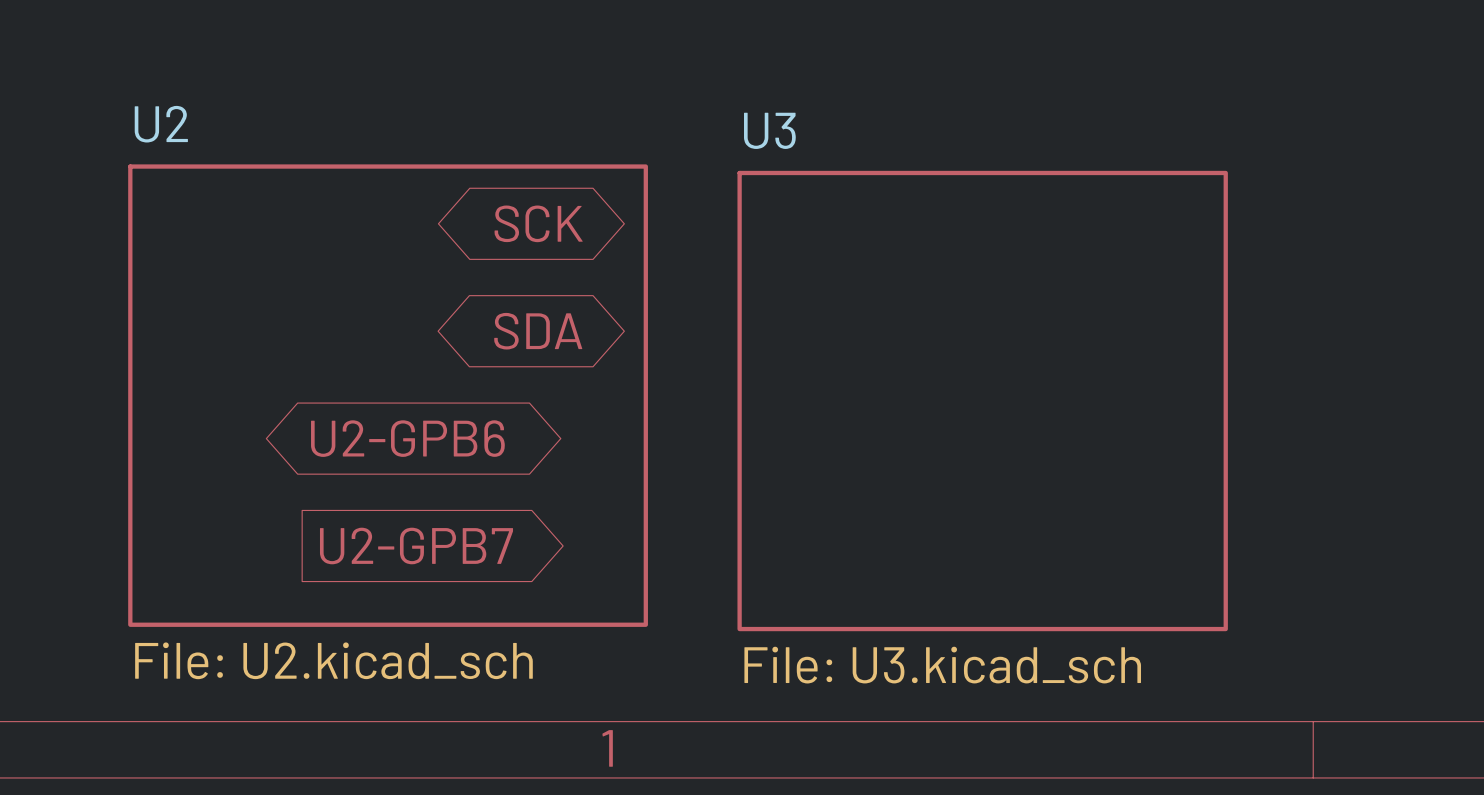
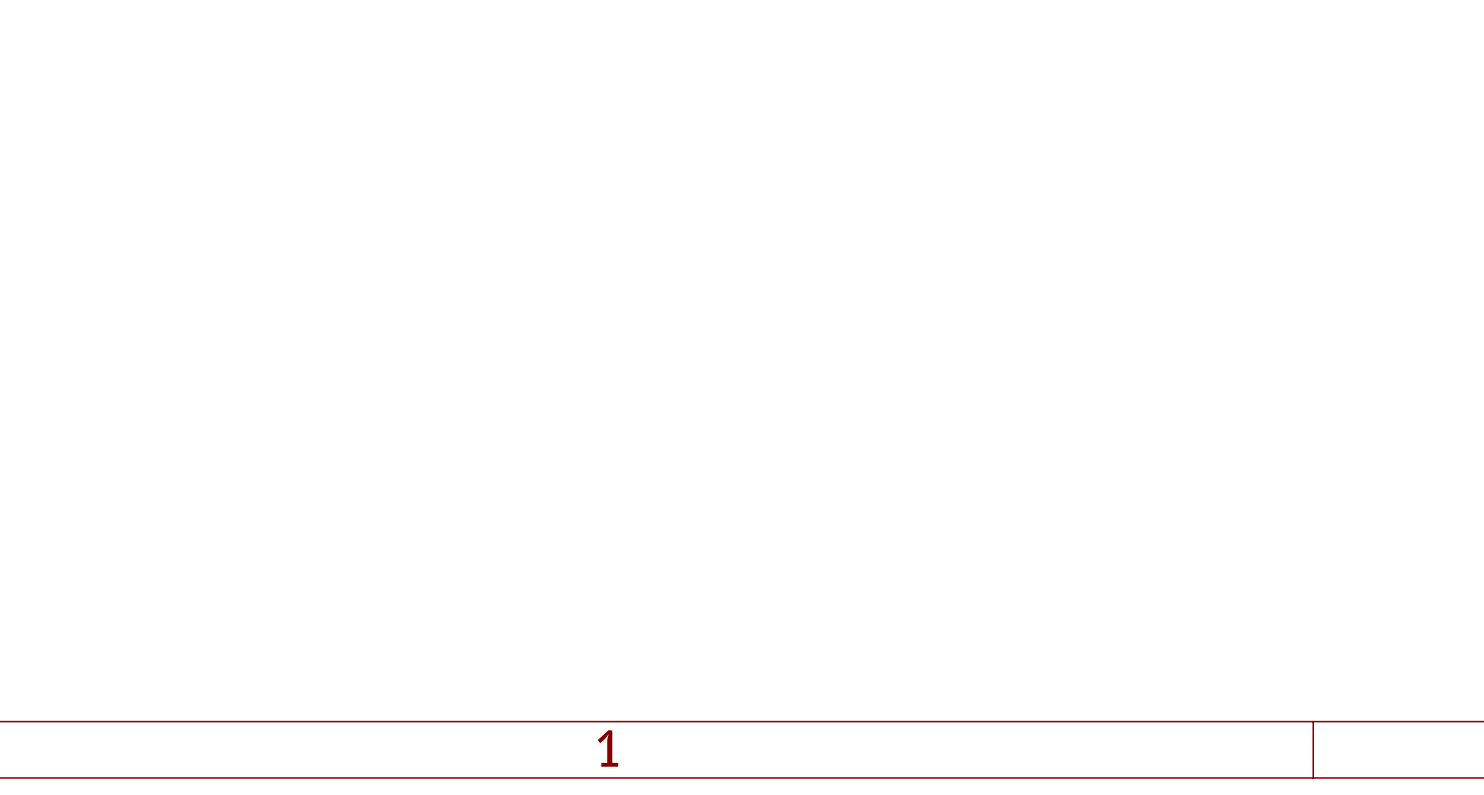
global label: SCK (538, 223) -> none
global label: SDA (538, 331) -> none
sheet U2: File: U2.kicad_sch (388, 395) -> none
sheet U3: File: U3.kicad_sch (982, 401) -> none
global label: U2-GPB6 (407, 438) -> none
global label: U2-GPB7 (416, 545) -> none

